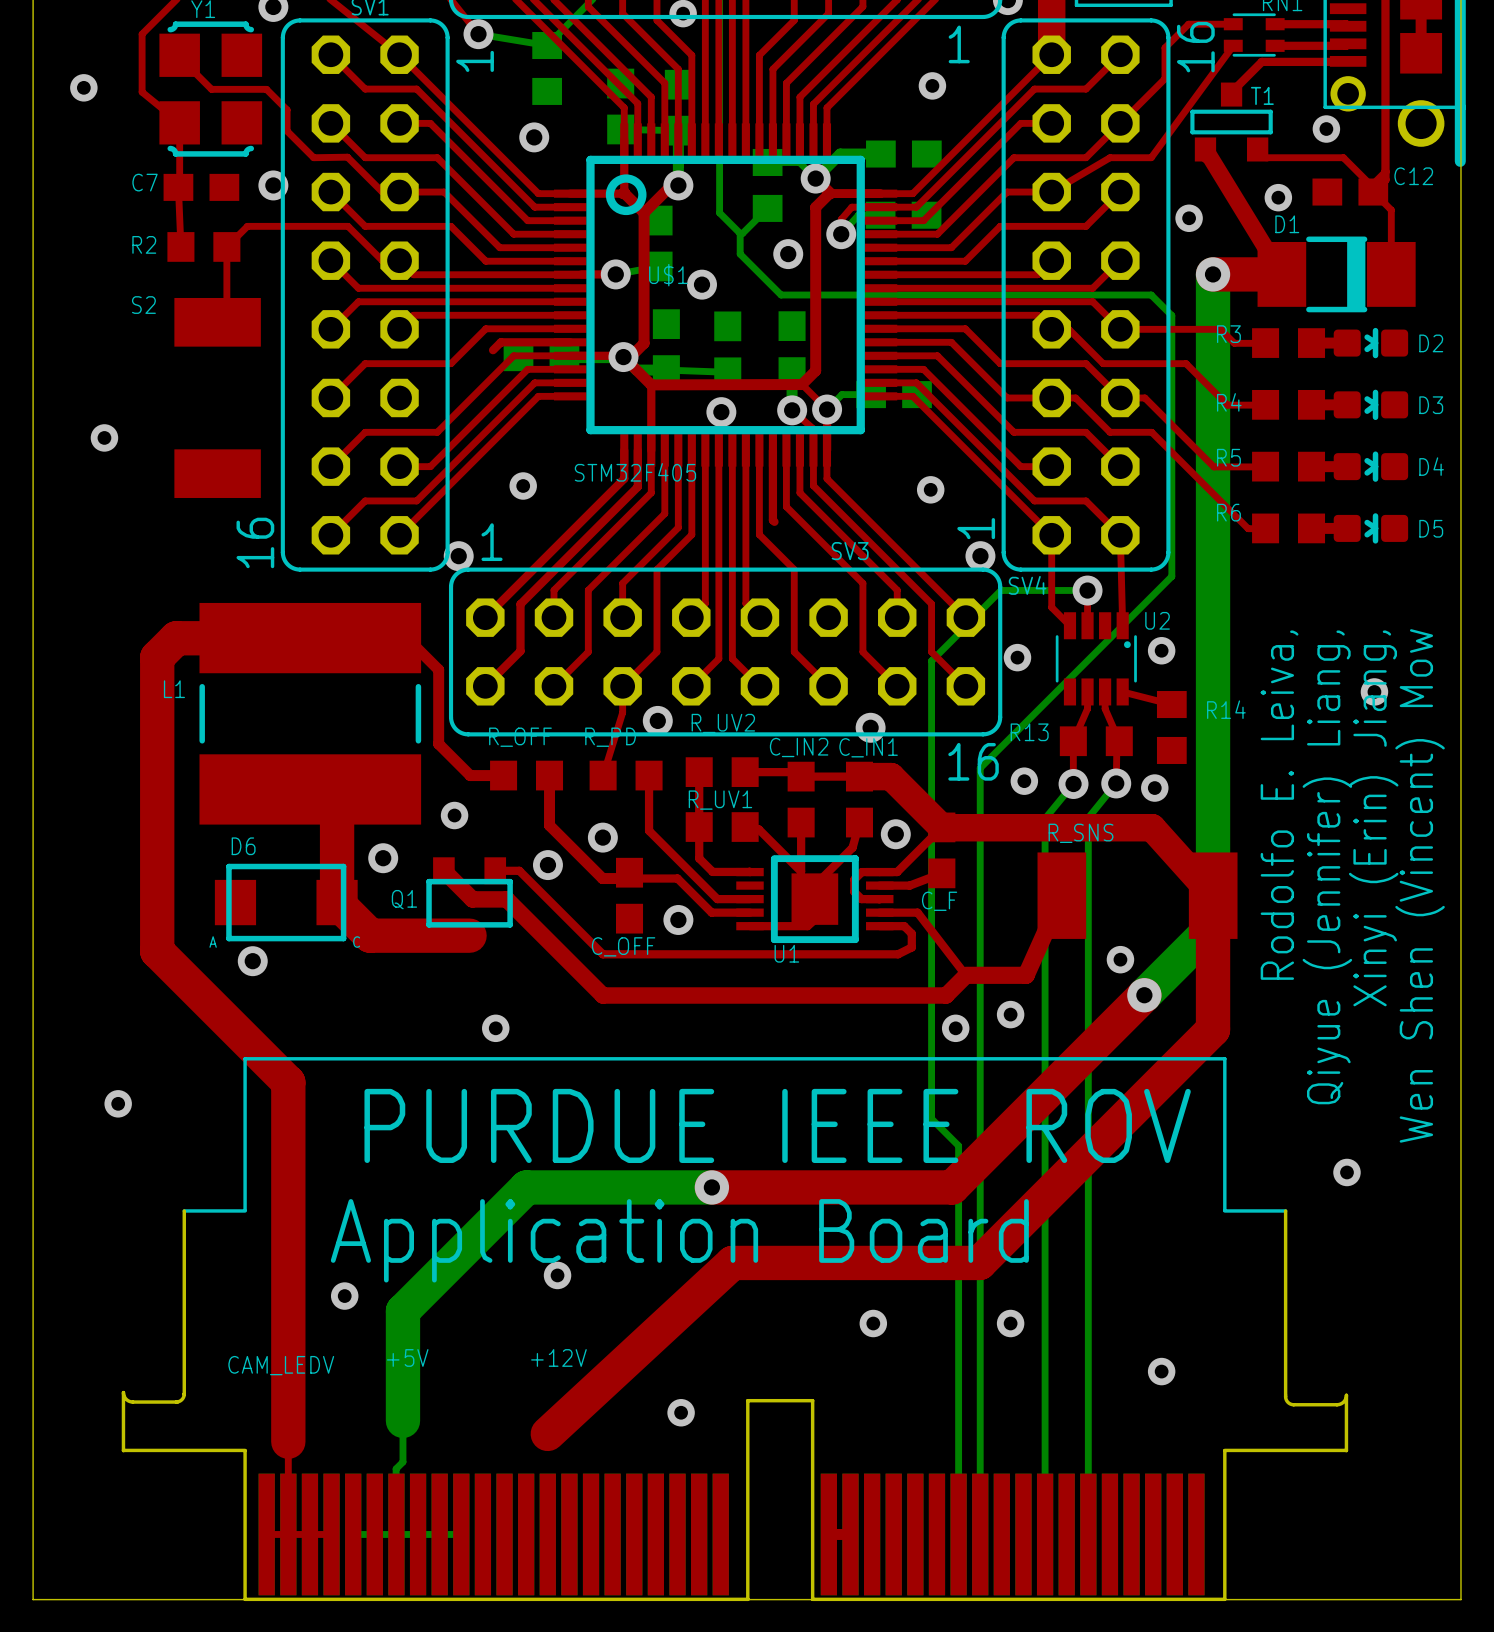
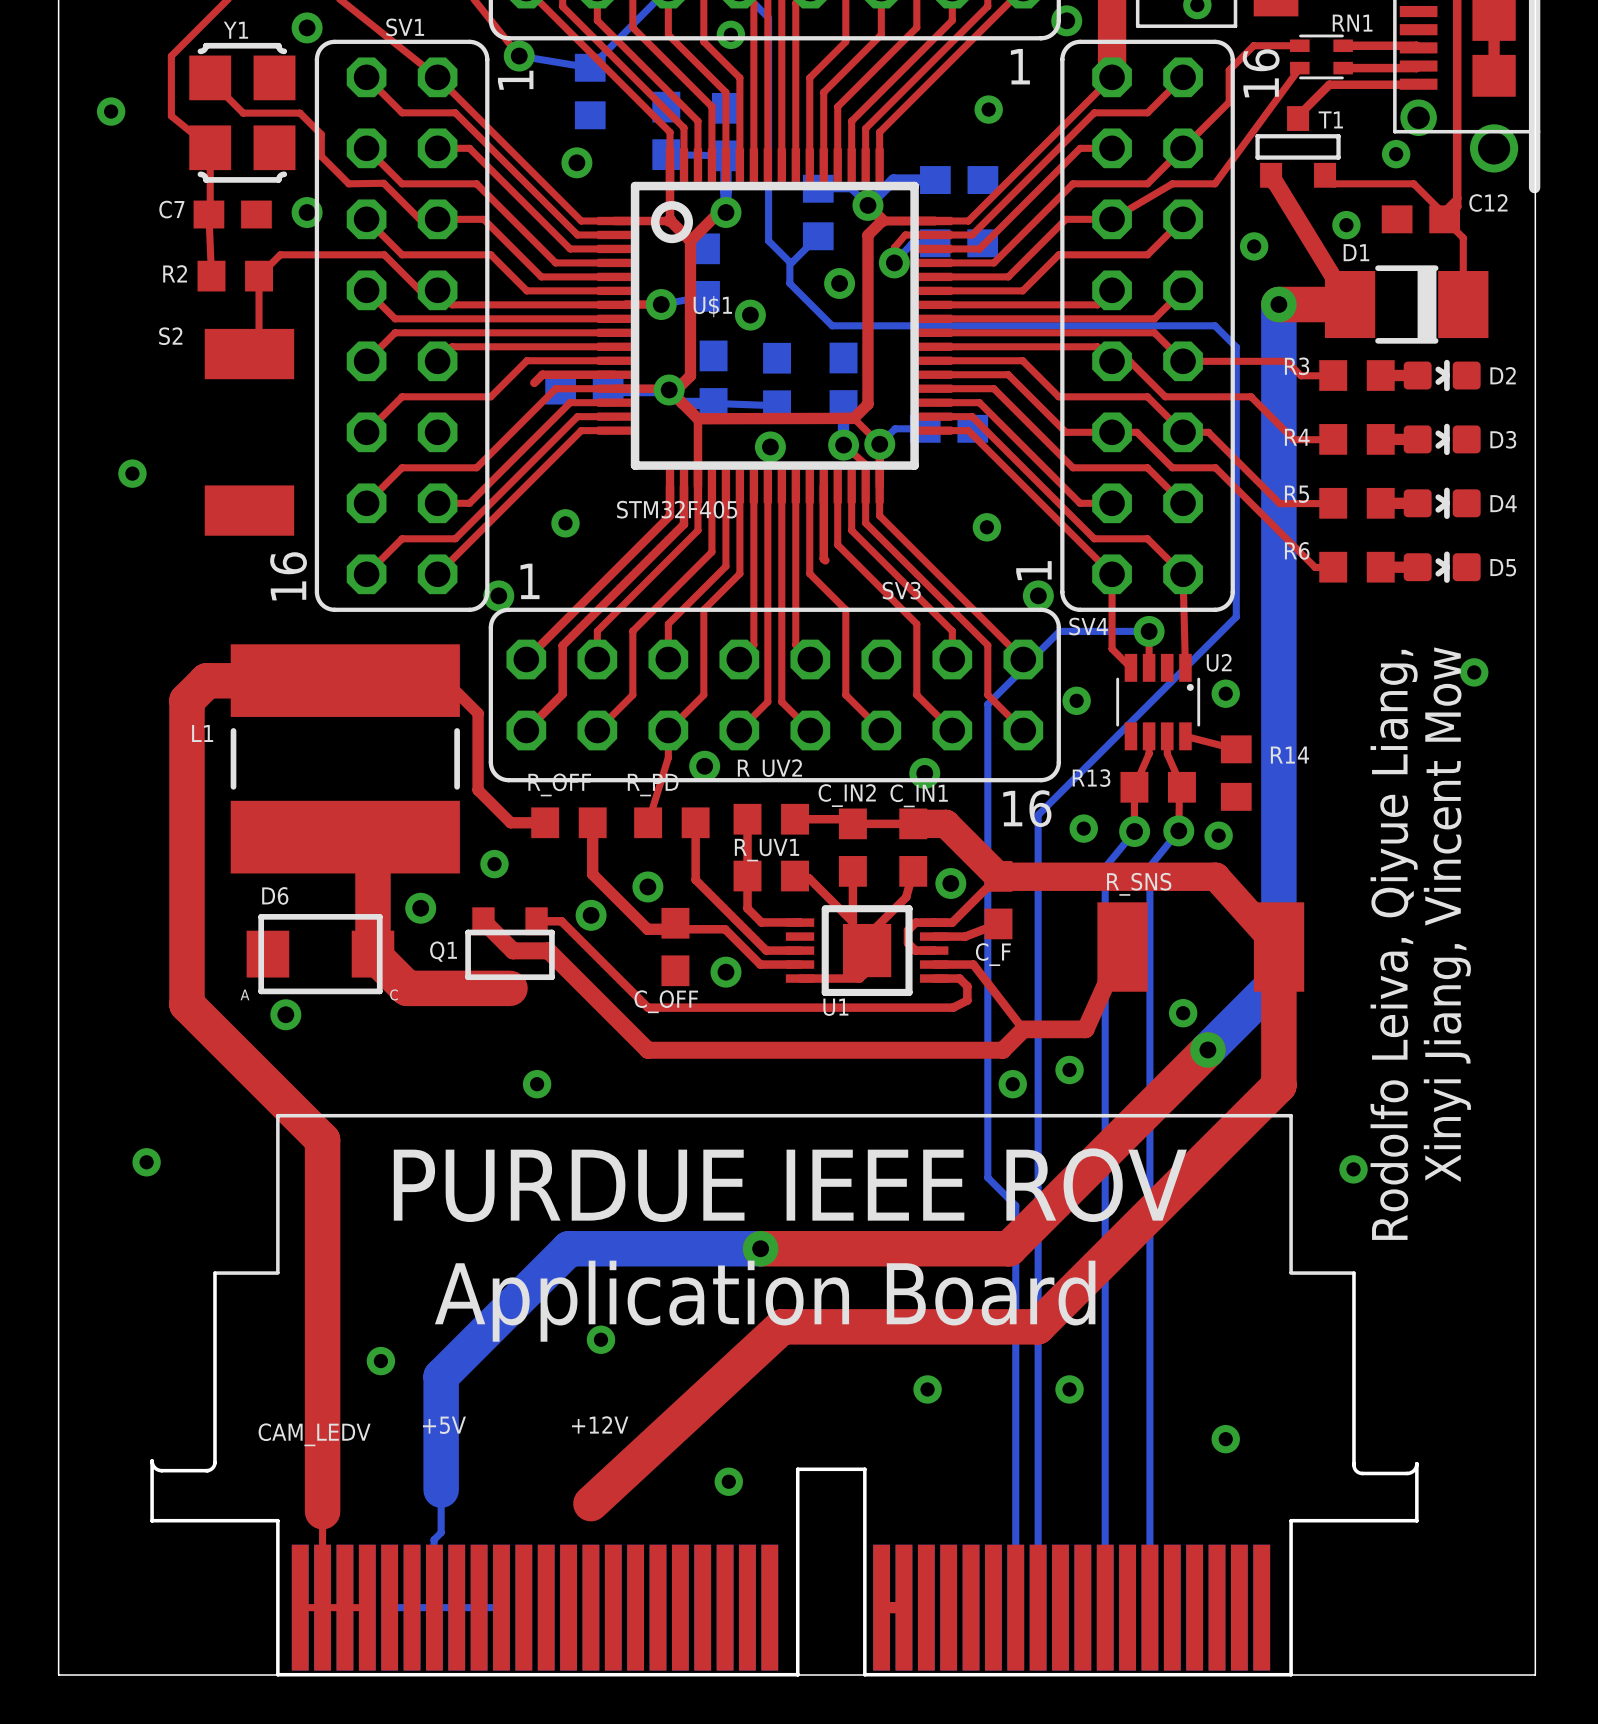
via position: (1374, 691) -> (1474, 672)
text: Rodolfo E. Leiva, (1279, 805) -> none
text: Xinyi (Erin) Jiang, (1373, 818) -> Xinyi Jiang, Vincent Mow (1447, 914)
text: Qiyue (Jennifer) Liang, (1327, 867) -> Rodolfo Leiva, Qiyue Liang, (1394, 944)
text: Wen Shen (Vincent) Mow (1420, 885) -> none
via position: (1346, 1172) -> (1353, 1169)

